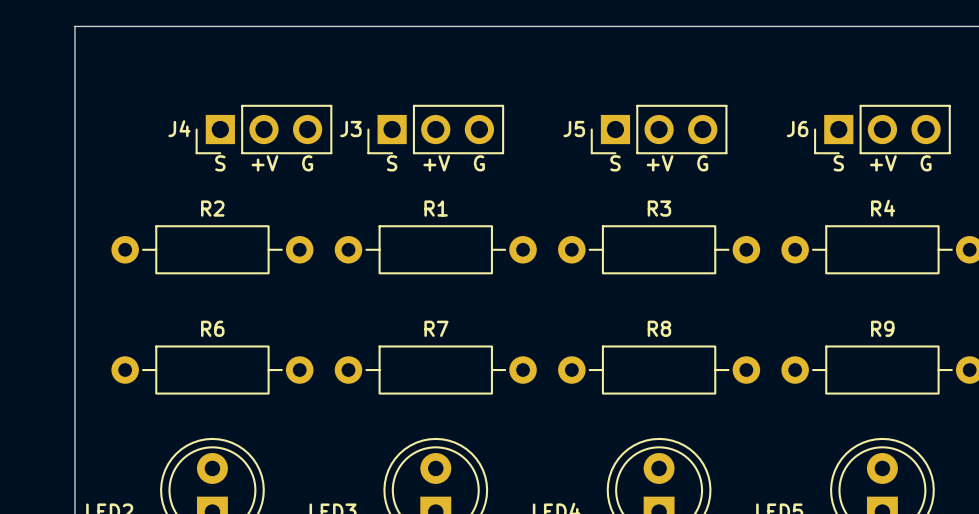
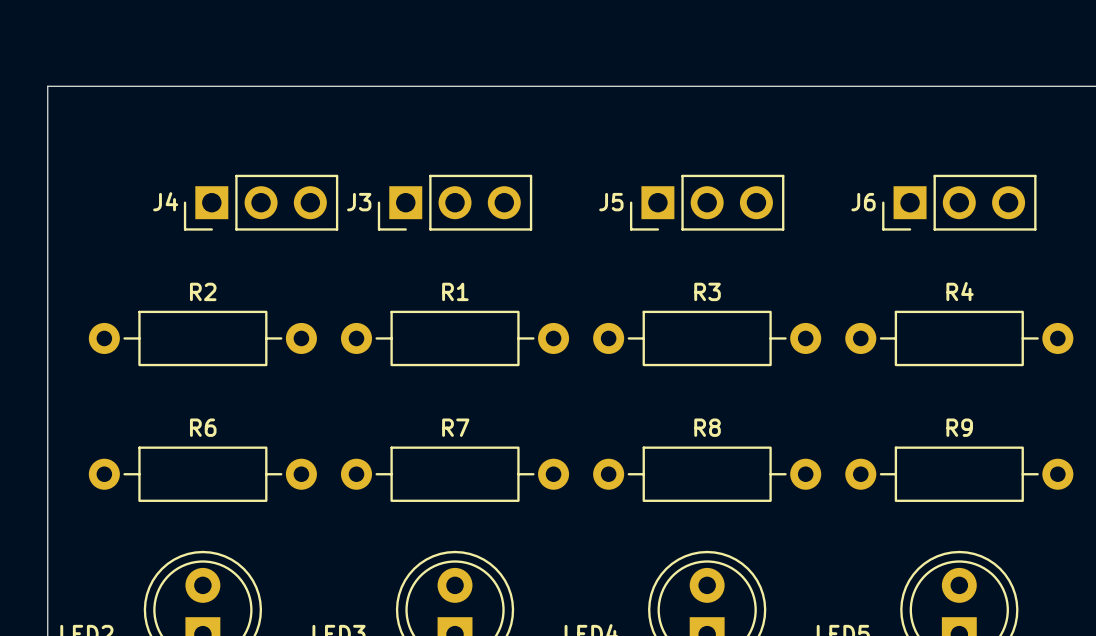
text: S (220, 163) -> none
text: +V (264, 163) -> none
text: G (307, 163) -> none
text: S (392, 163) -> none
text: +V (436, 163) -> none
text: G (479, 163) -> none
text: S (615, 163) -> none
text: +V (660, 163) -> none
text: G (702, 163) -> none
text: S (838, 163) -> none
text: +V (883, 163) -> none
text: G (926, 163) -> none

